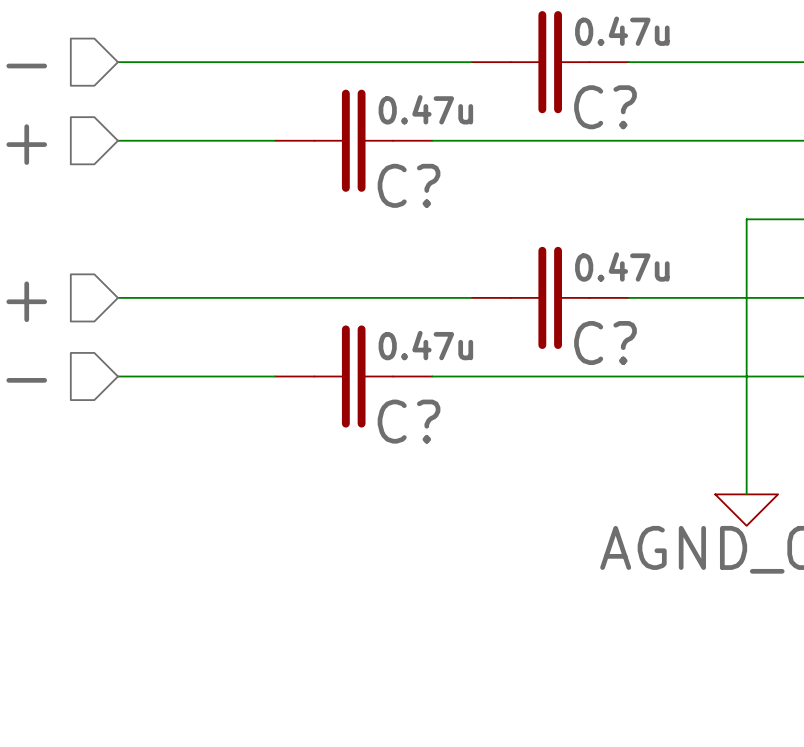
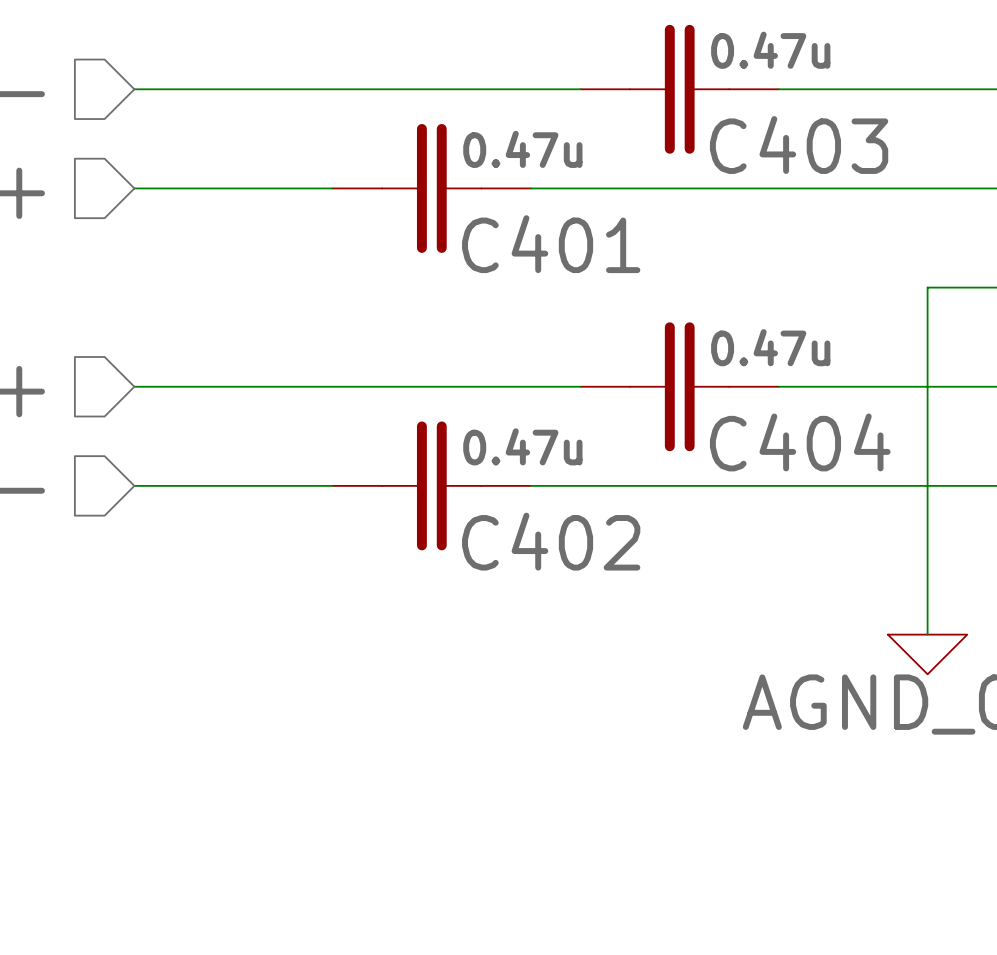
C? name: C? (605, 107) -> C403 (799, 145)
C? name: C? (409, 185) -> C401 (551, 244)
C? name: C? (605, 343) -> C404 (800, 442)
C? name: C? (409, 421) -> C402 (551, 541)

